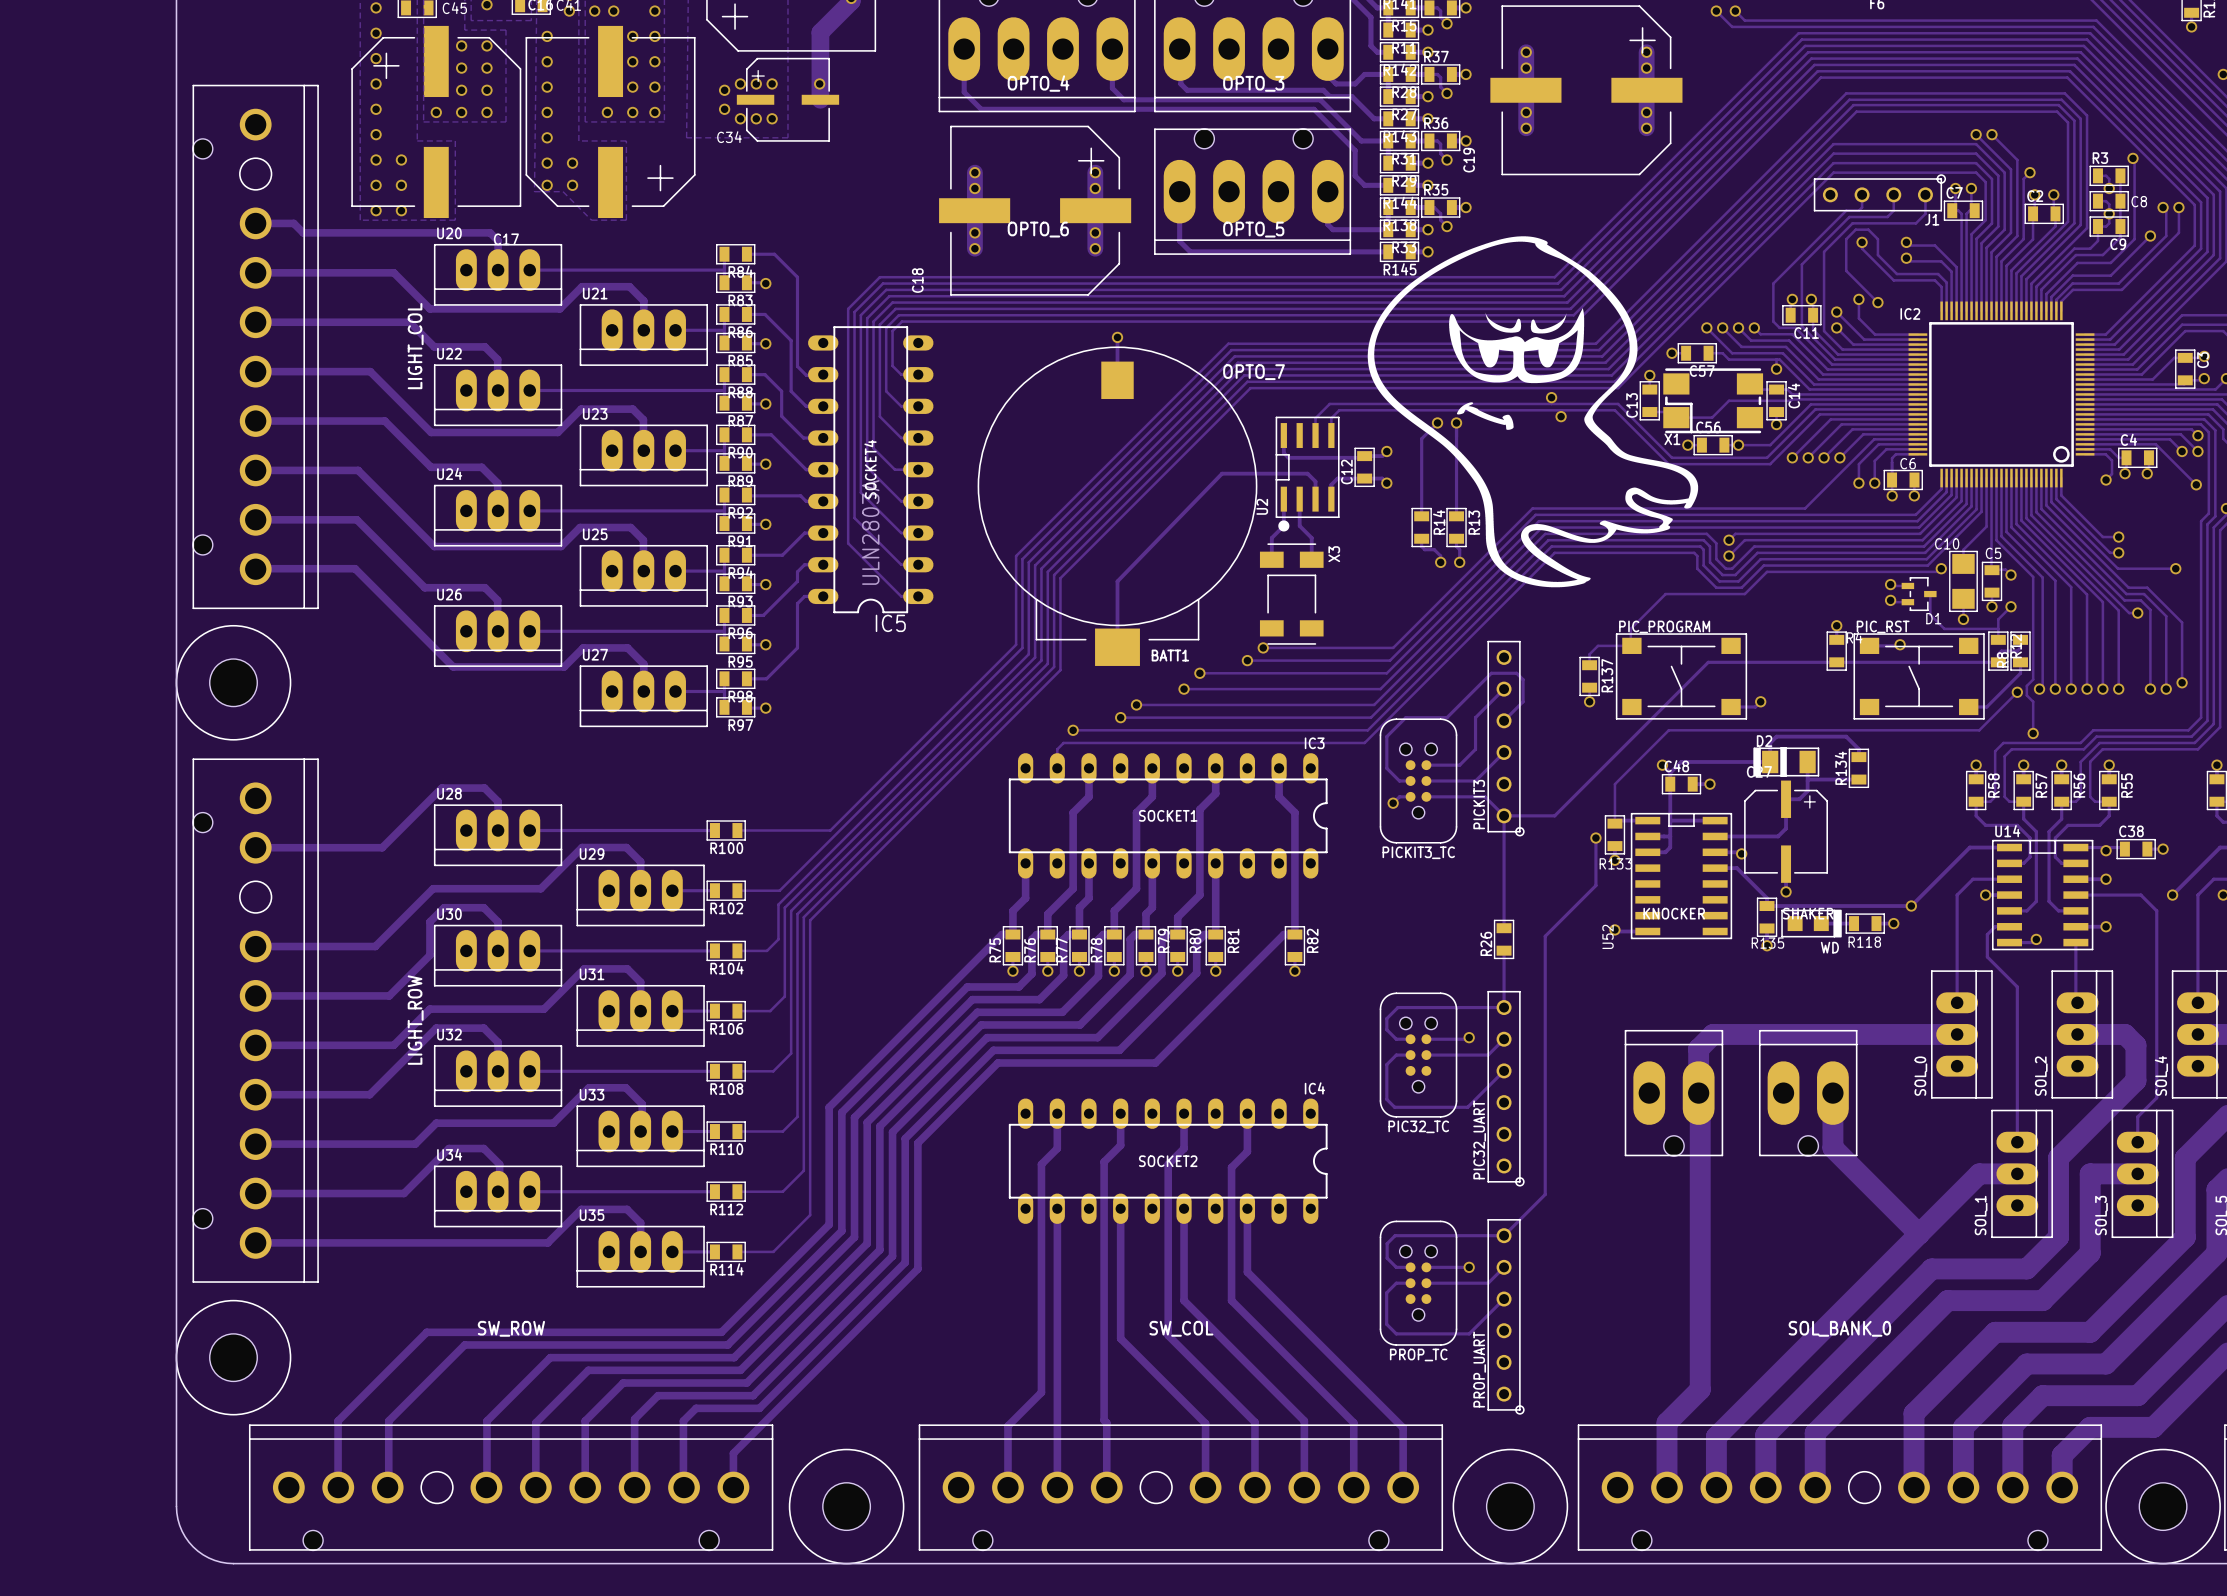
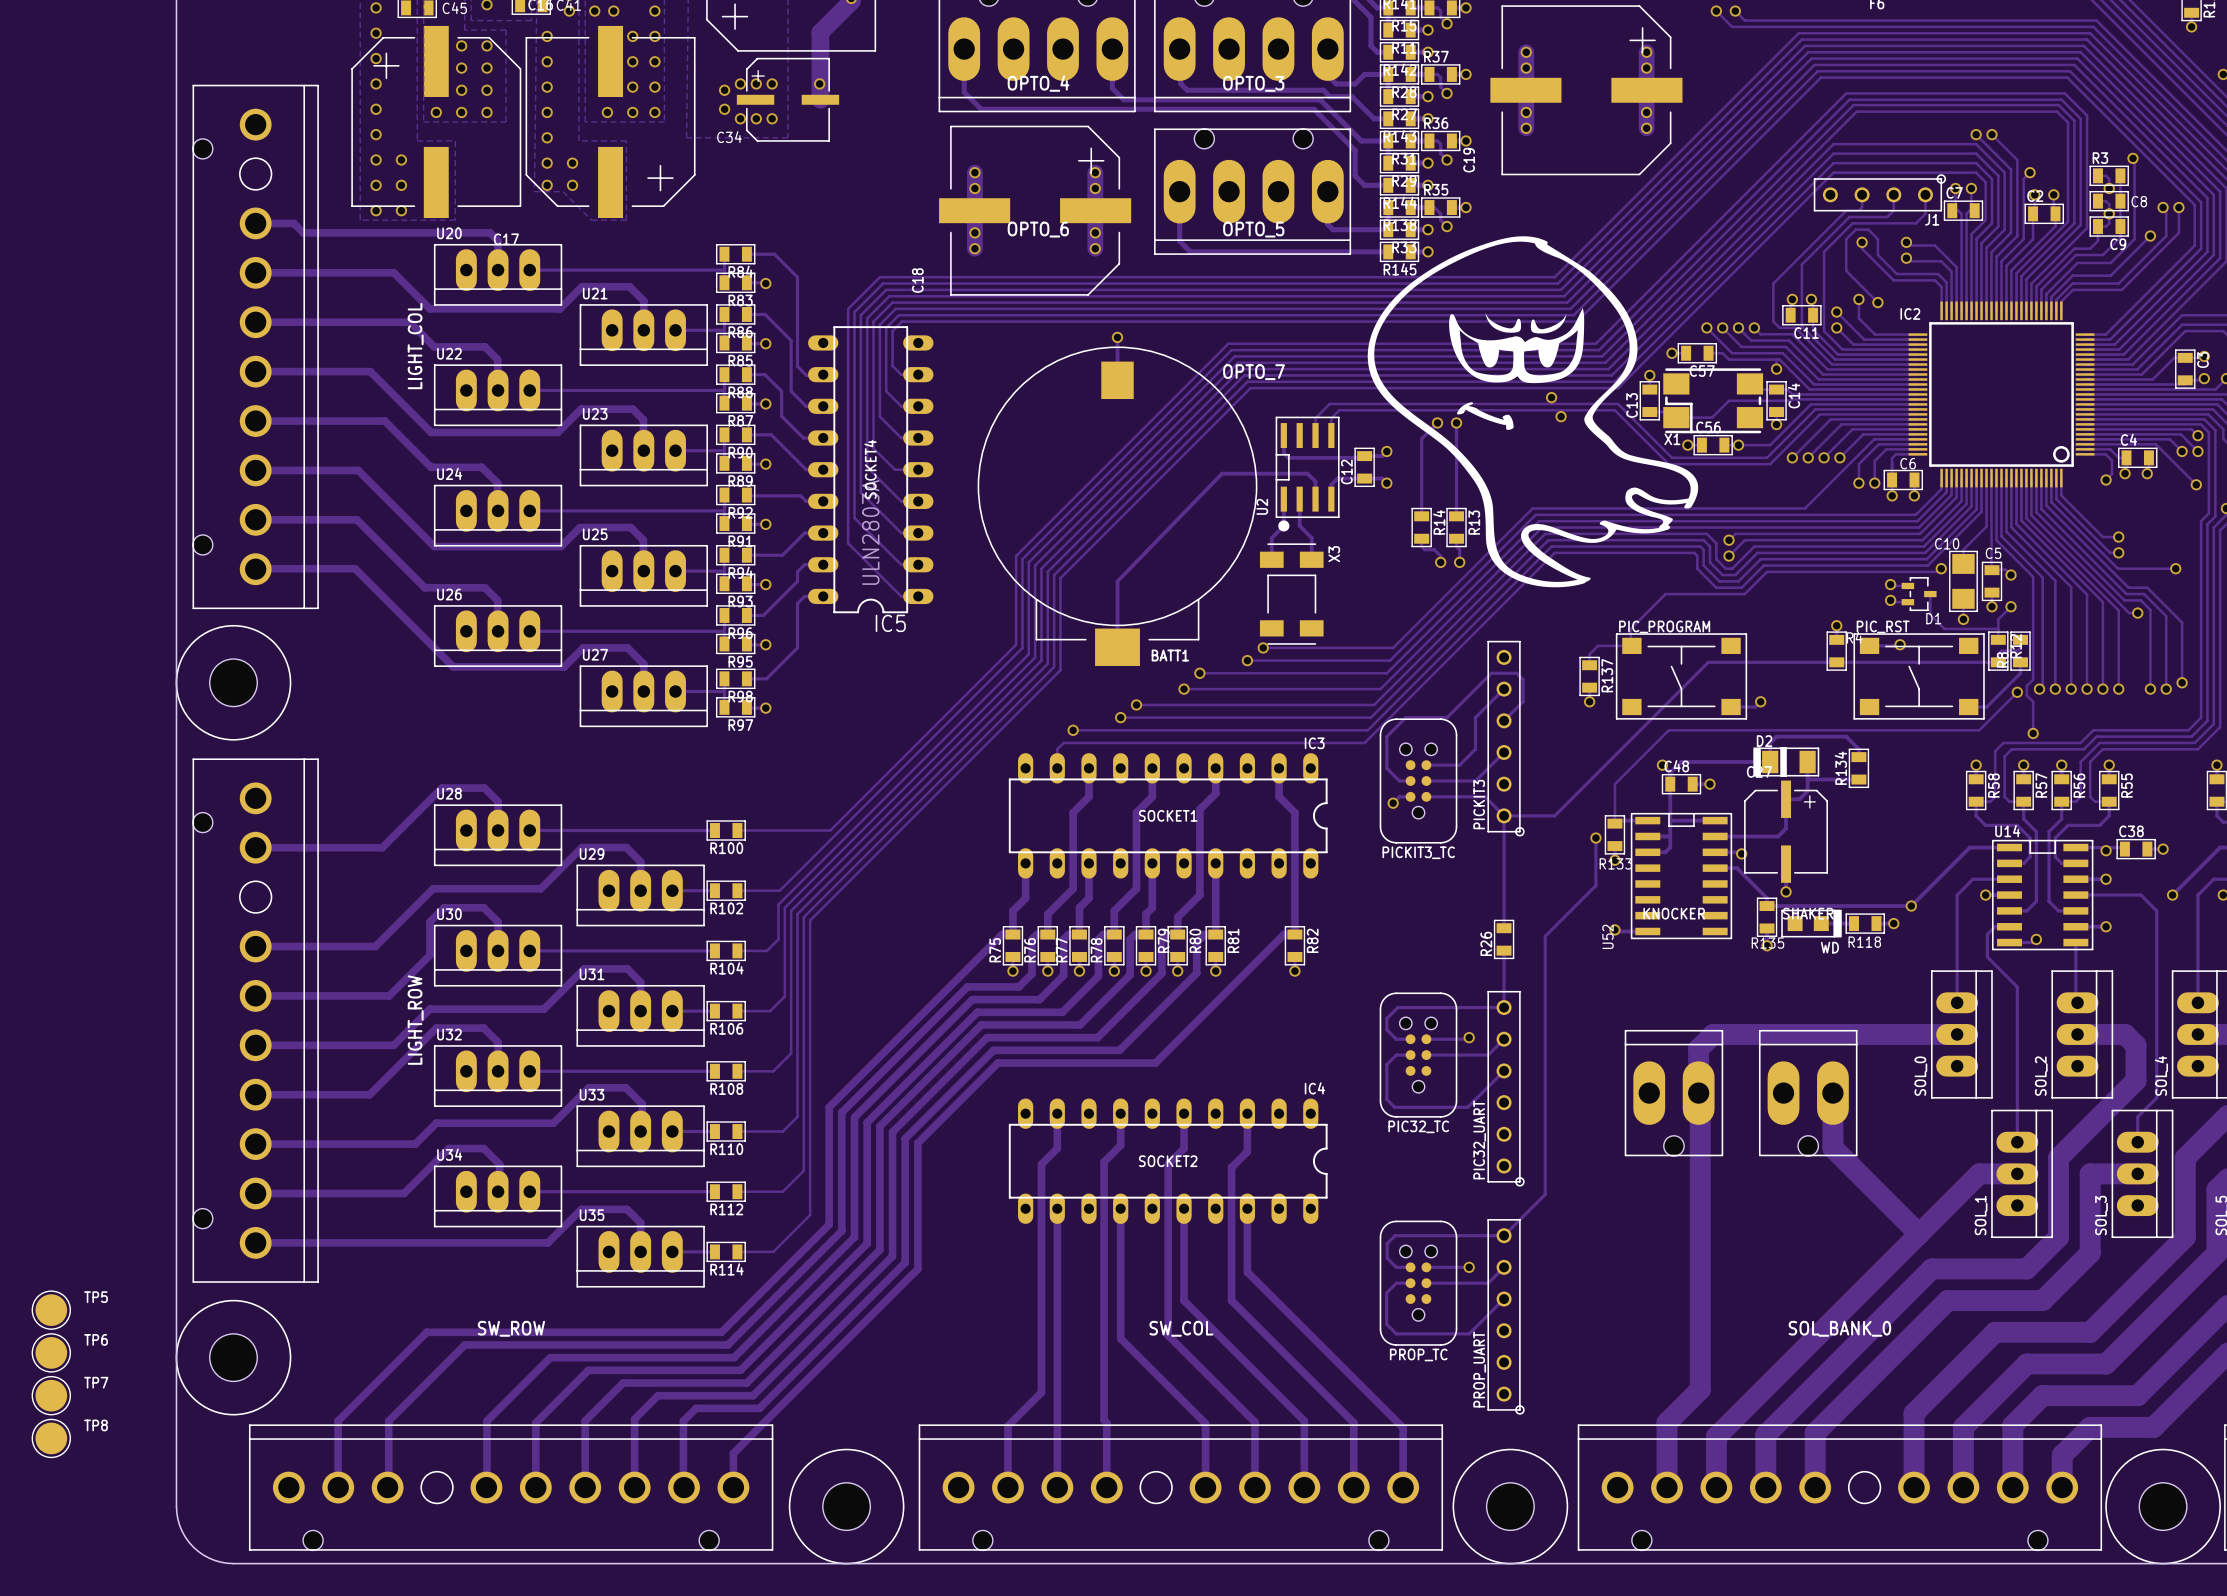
TP5: none -> (51, 1310)
TP6: none -> (51, 1352)
TP7: none -> (51, 1395)
TP8: none -> (51, 1438)

